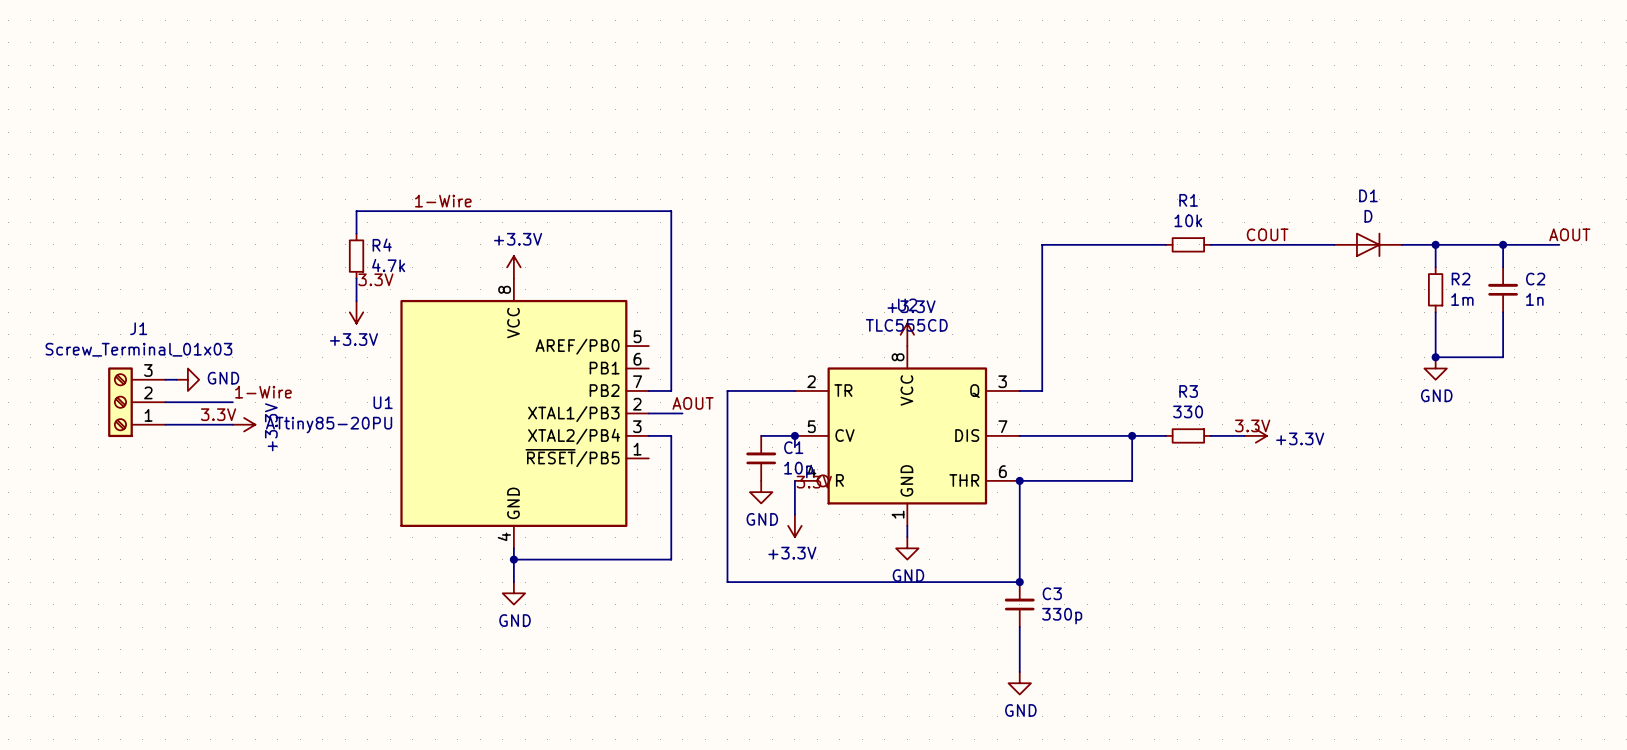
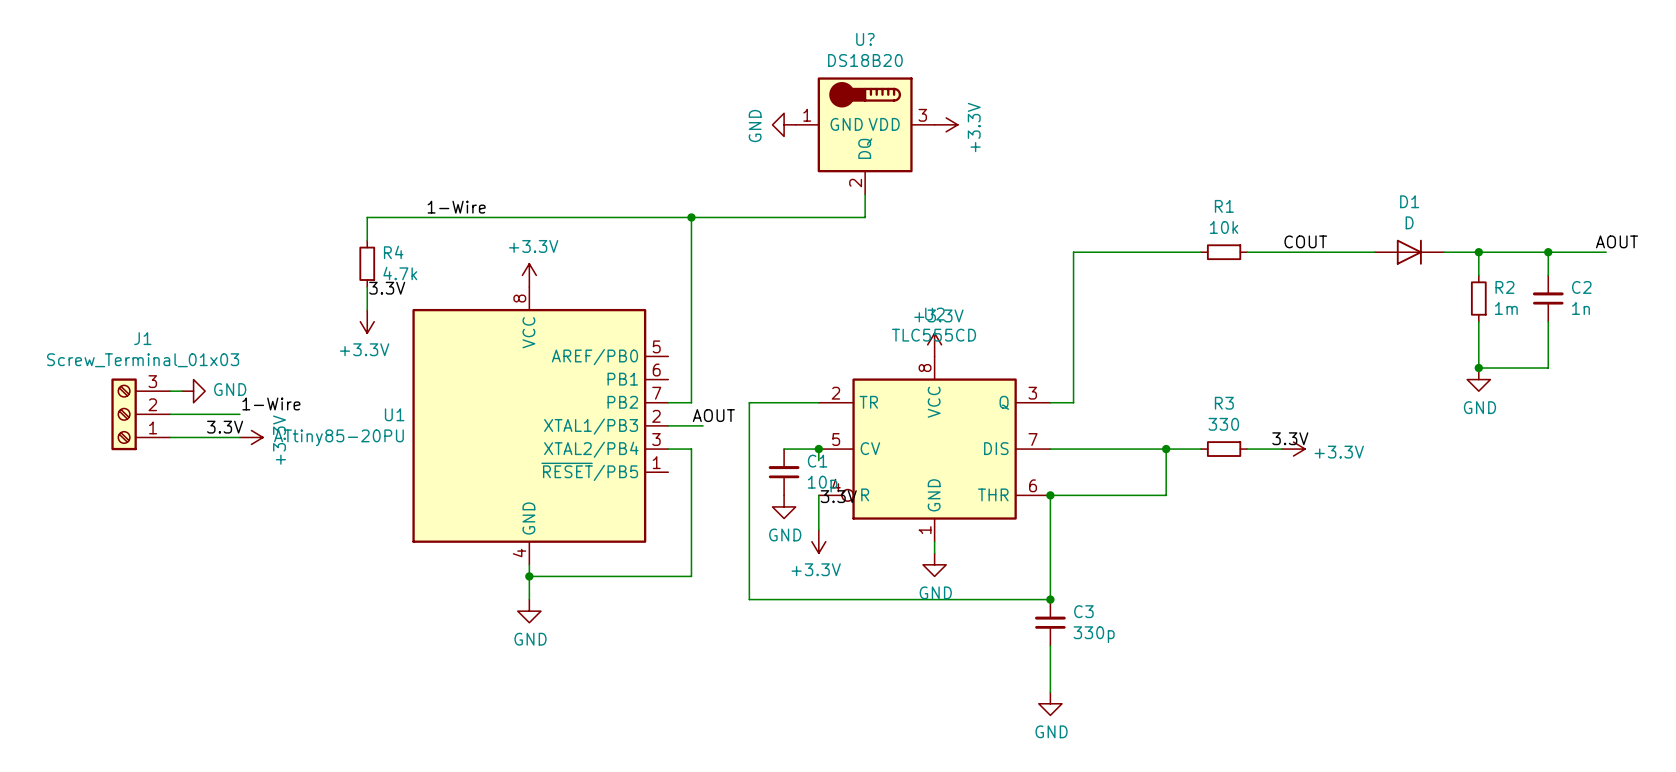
power symbol: none -> GND (784, 124)
power symbol: none -> +3.3V (946, 124)
U?: none -> DS18B20 (865, 135)
wire: none -> (865, 194) (865, 217) (691, 217)
junction: none -> (691, 217)

